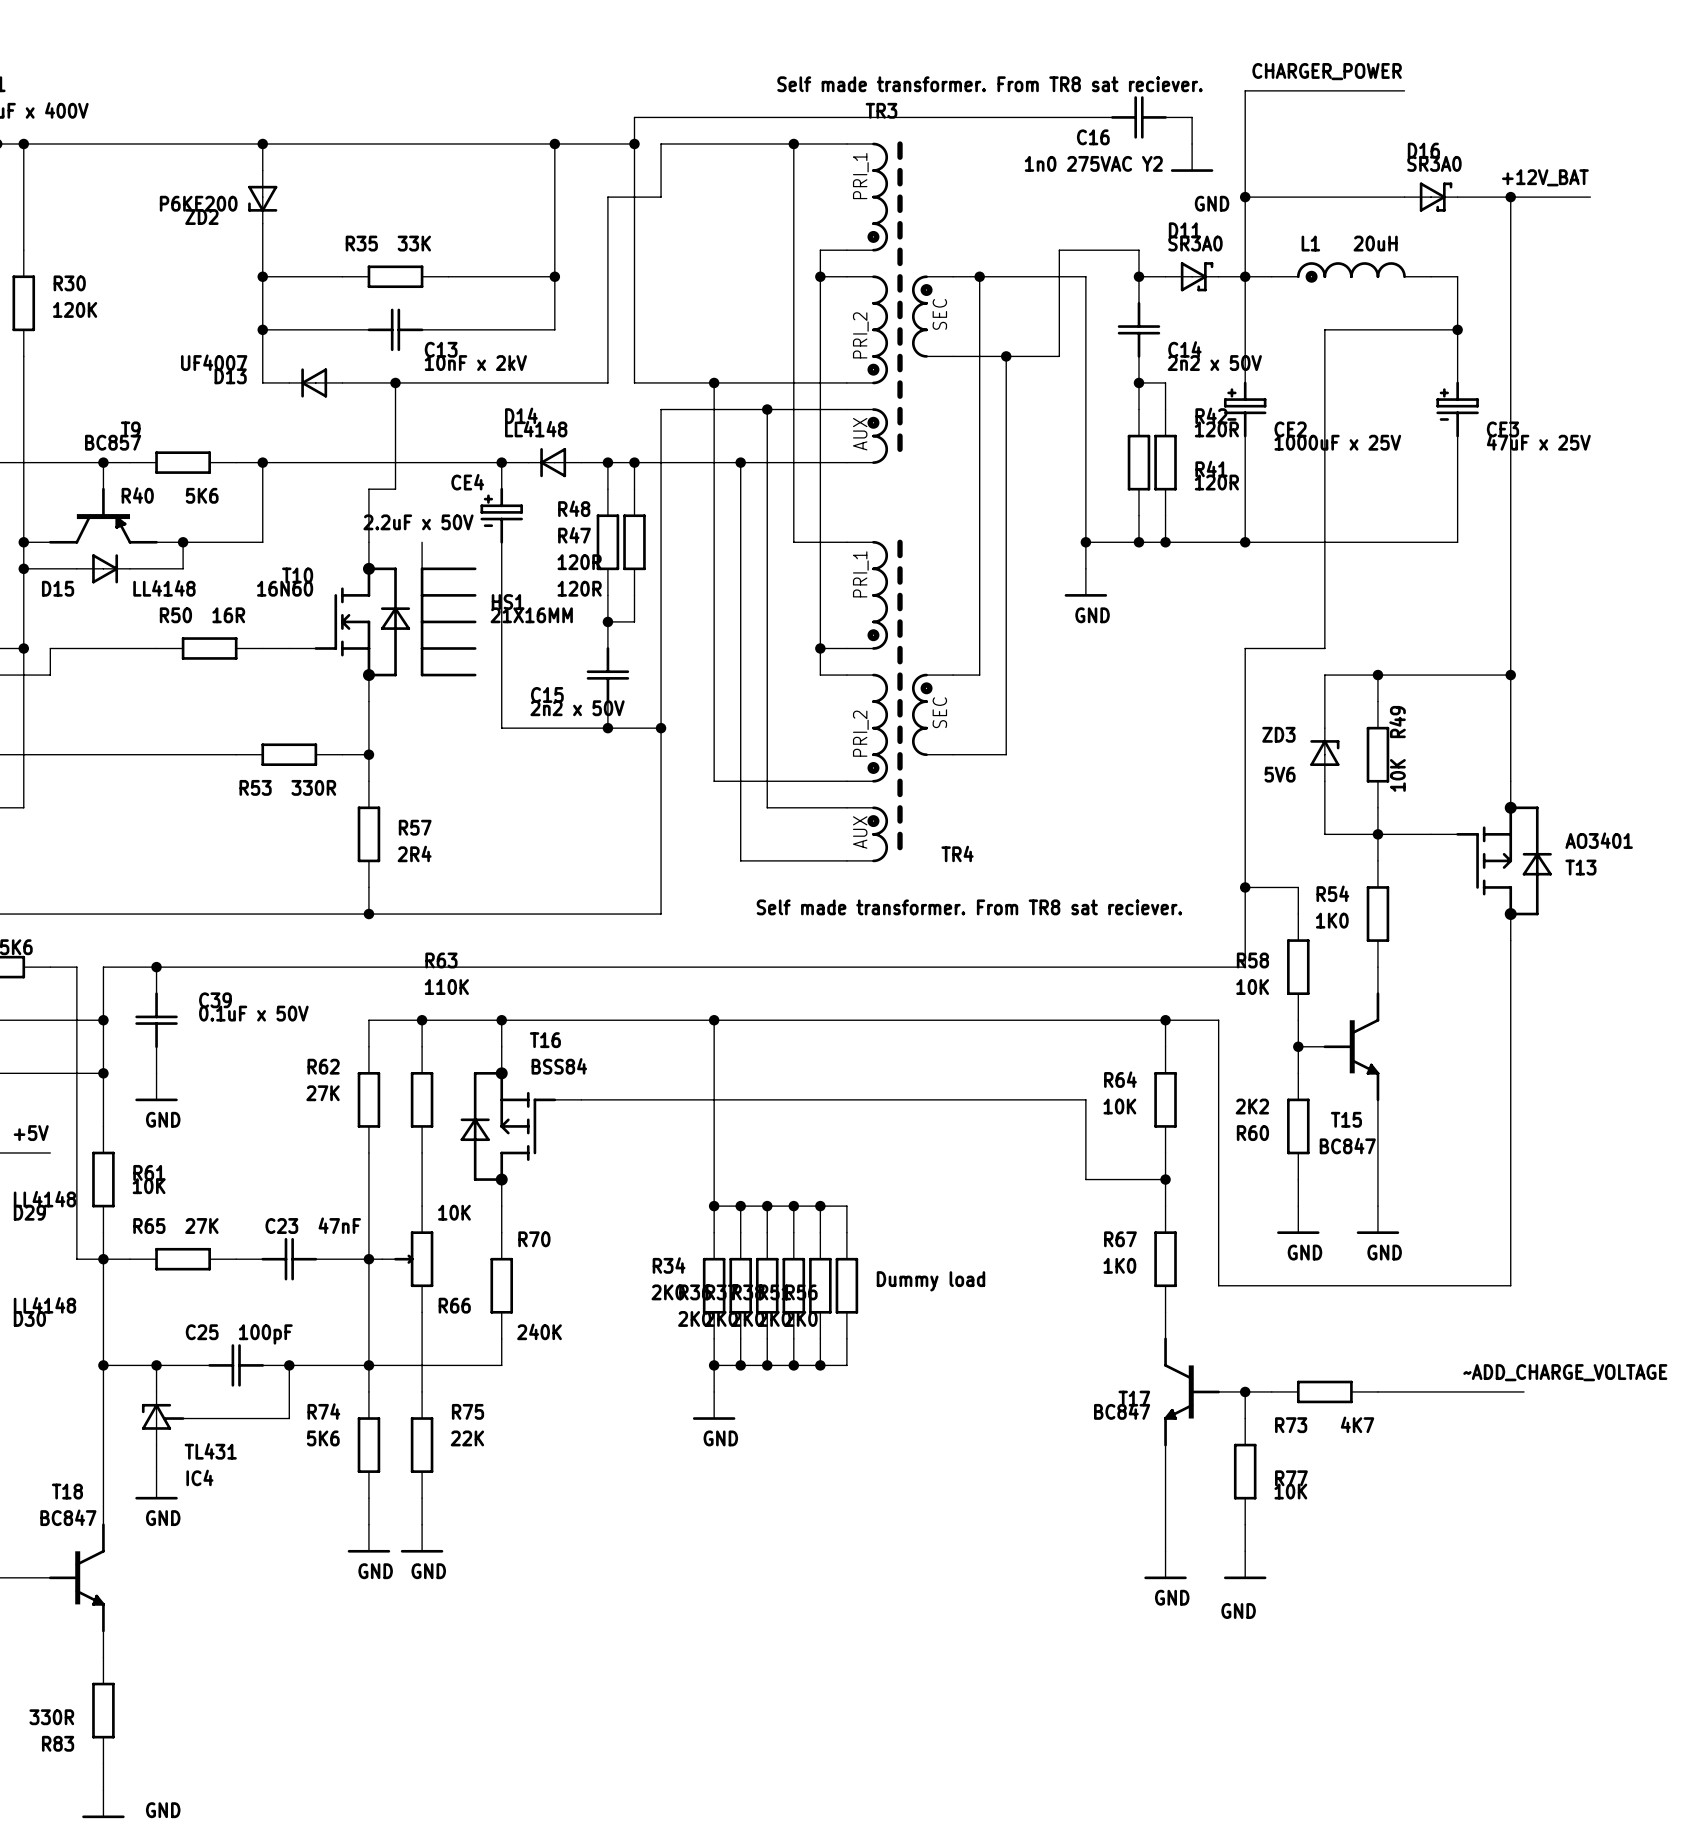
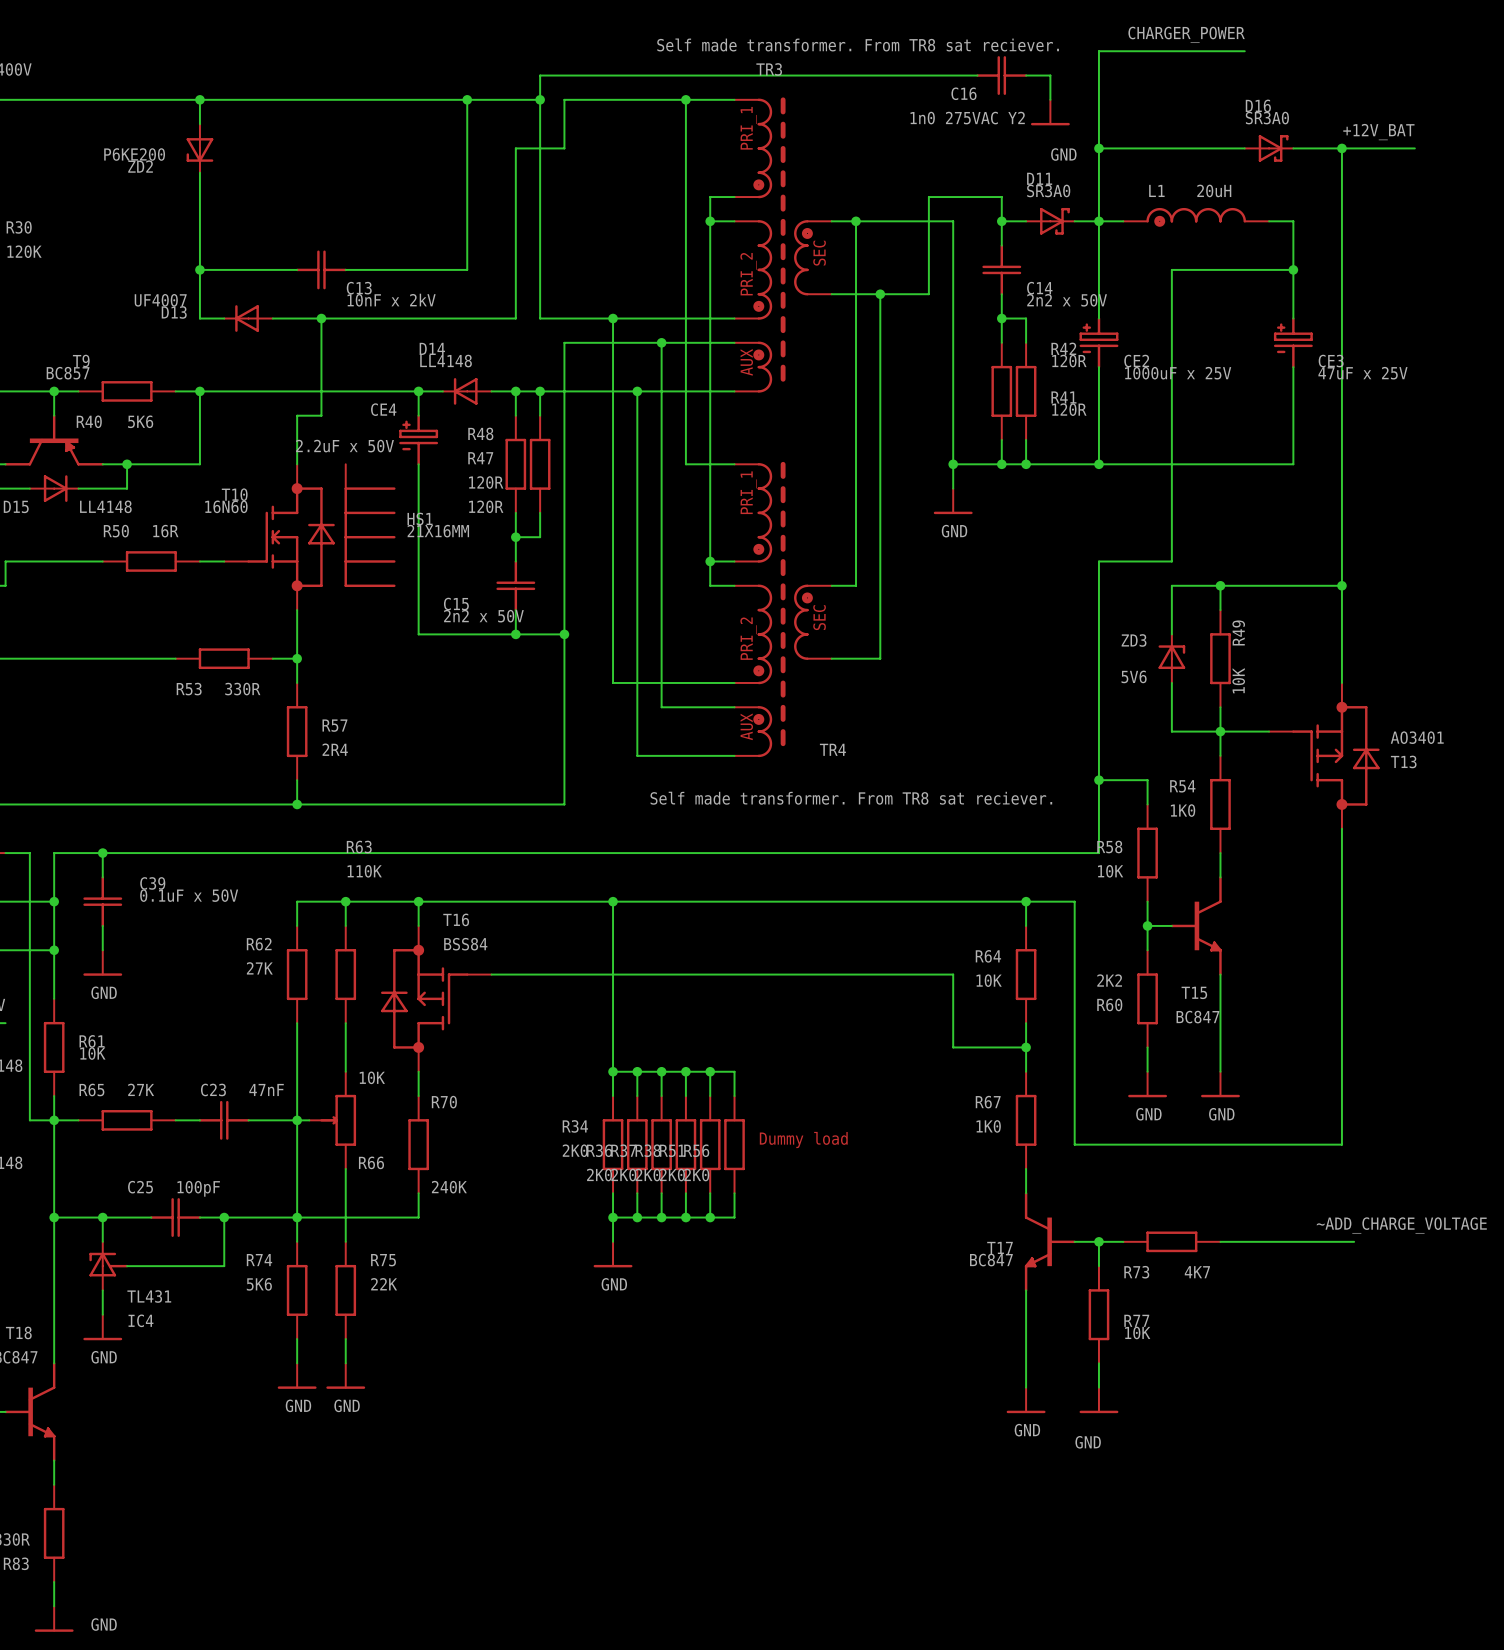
wire: (262, 276) (342, 276) -> none
junction: (262, 276) -> none
R35: 33K (395, 276) -> none
wire: (448, 276) (554, 276) -> none
junction: (554, 276) -> none

